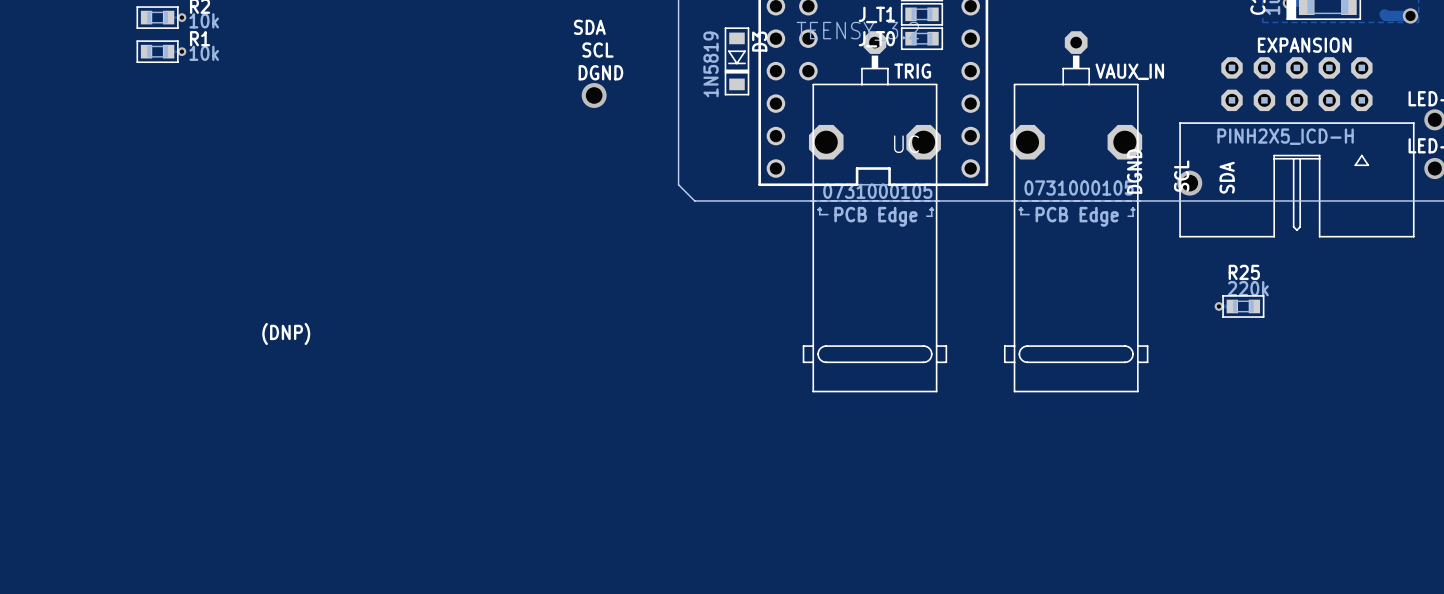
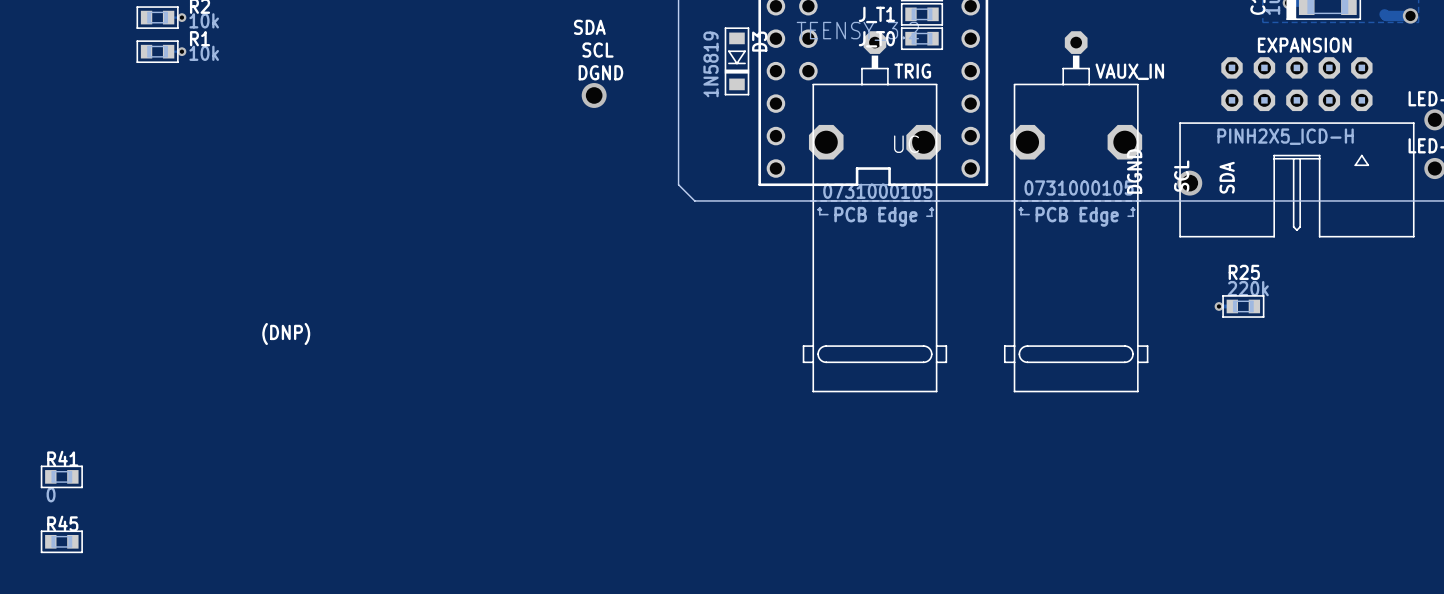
R41: none -> 0 (61, 476)
R45: none -> (61, 541)

